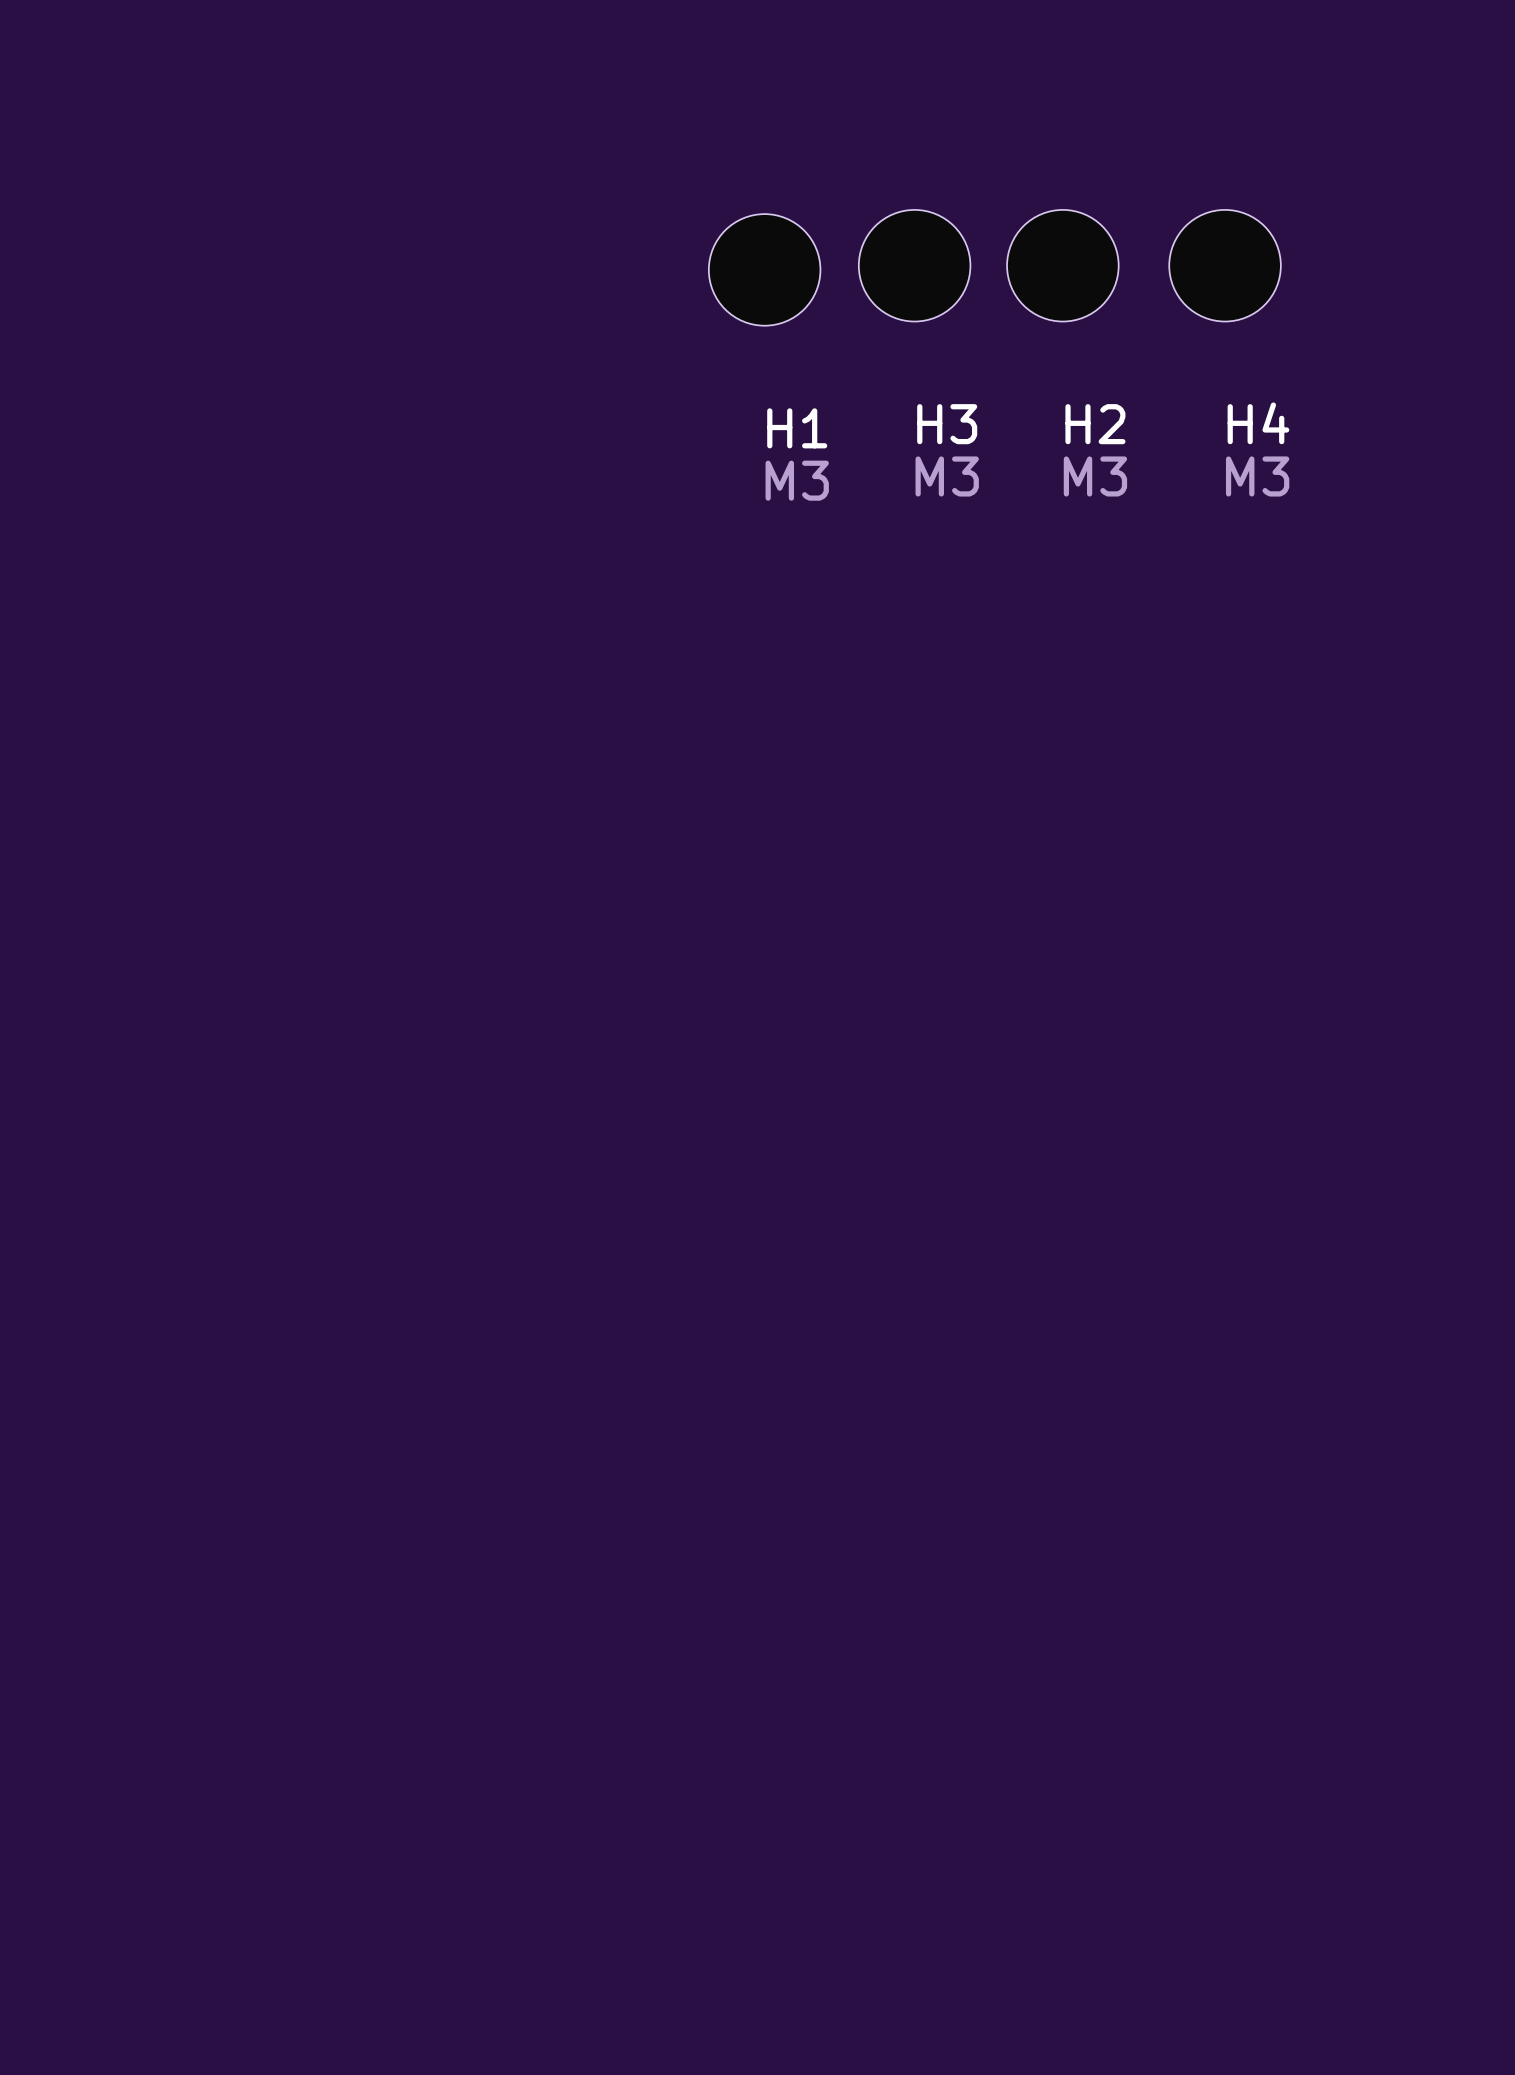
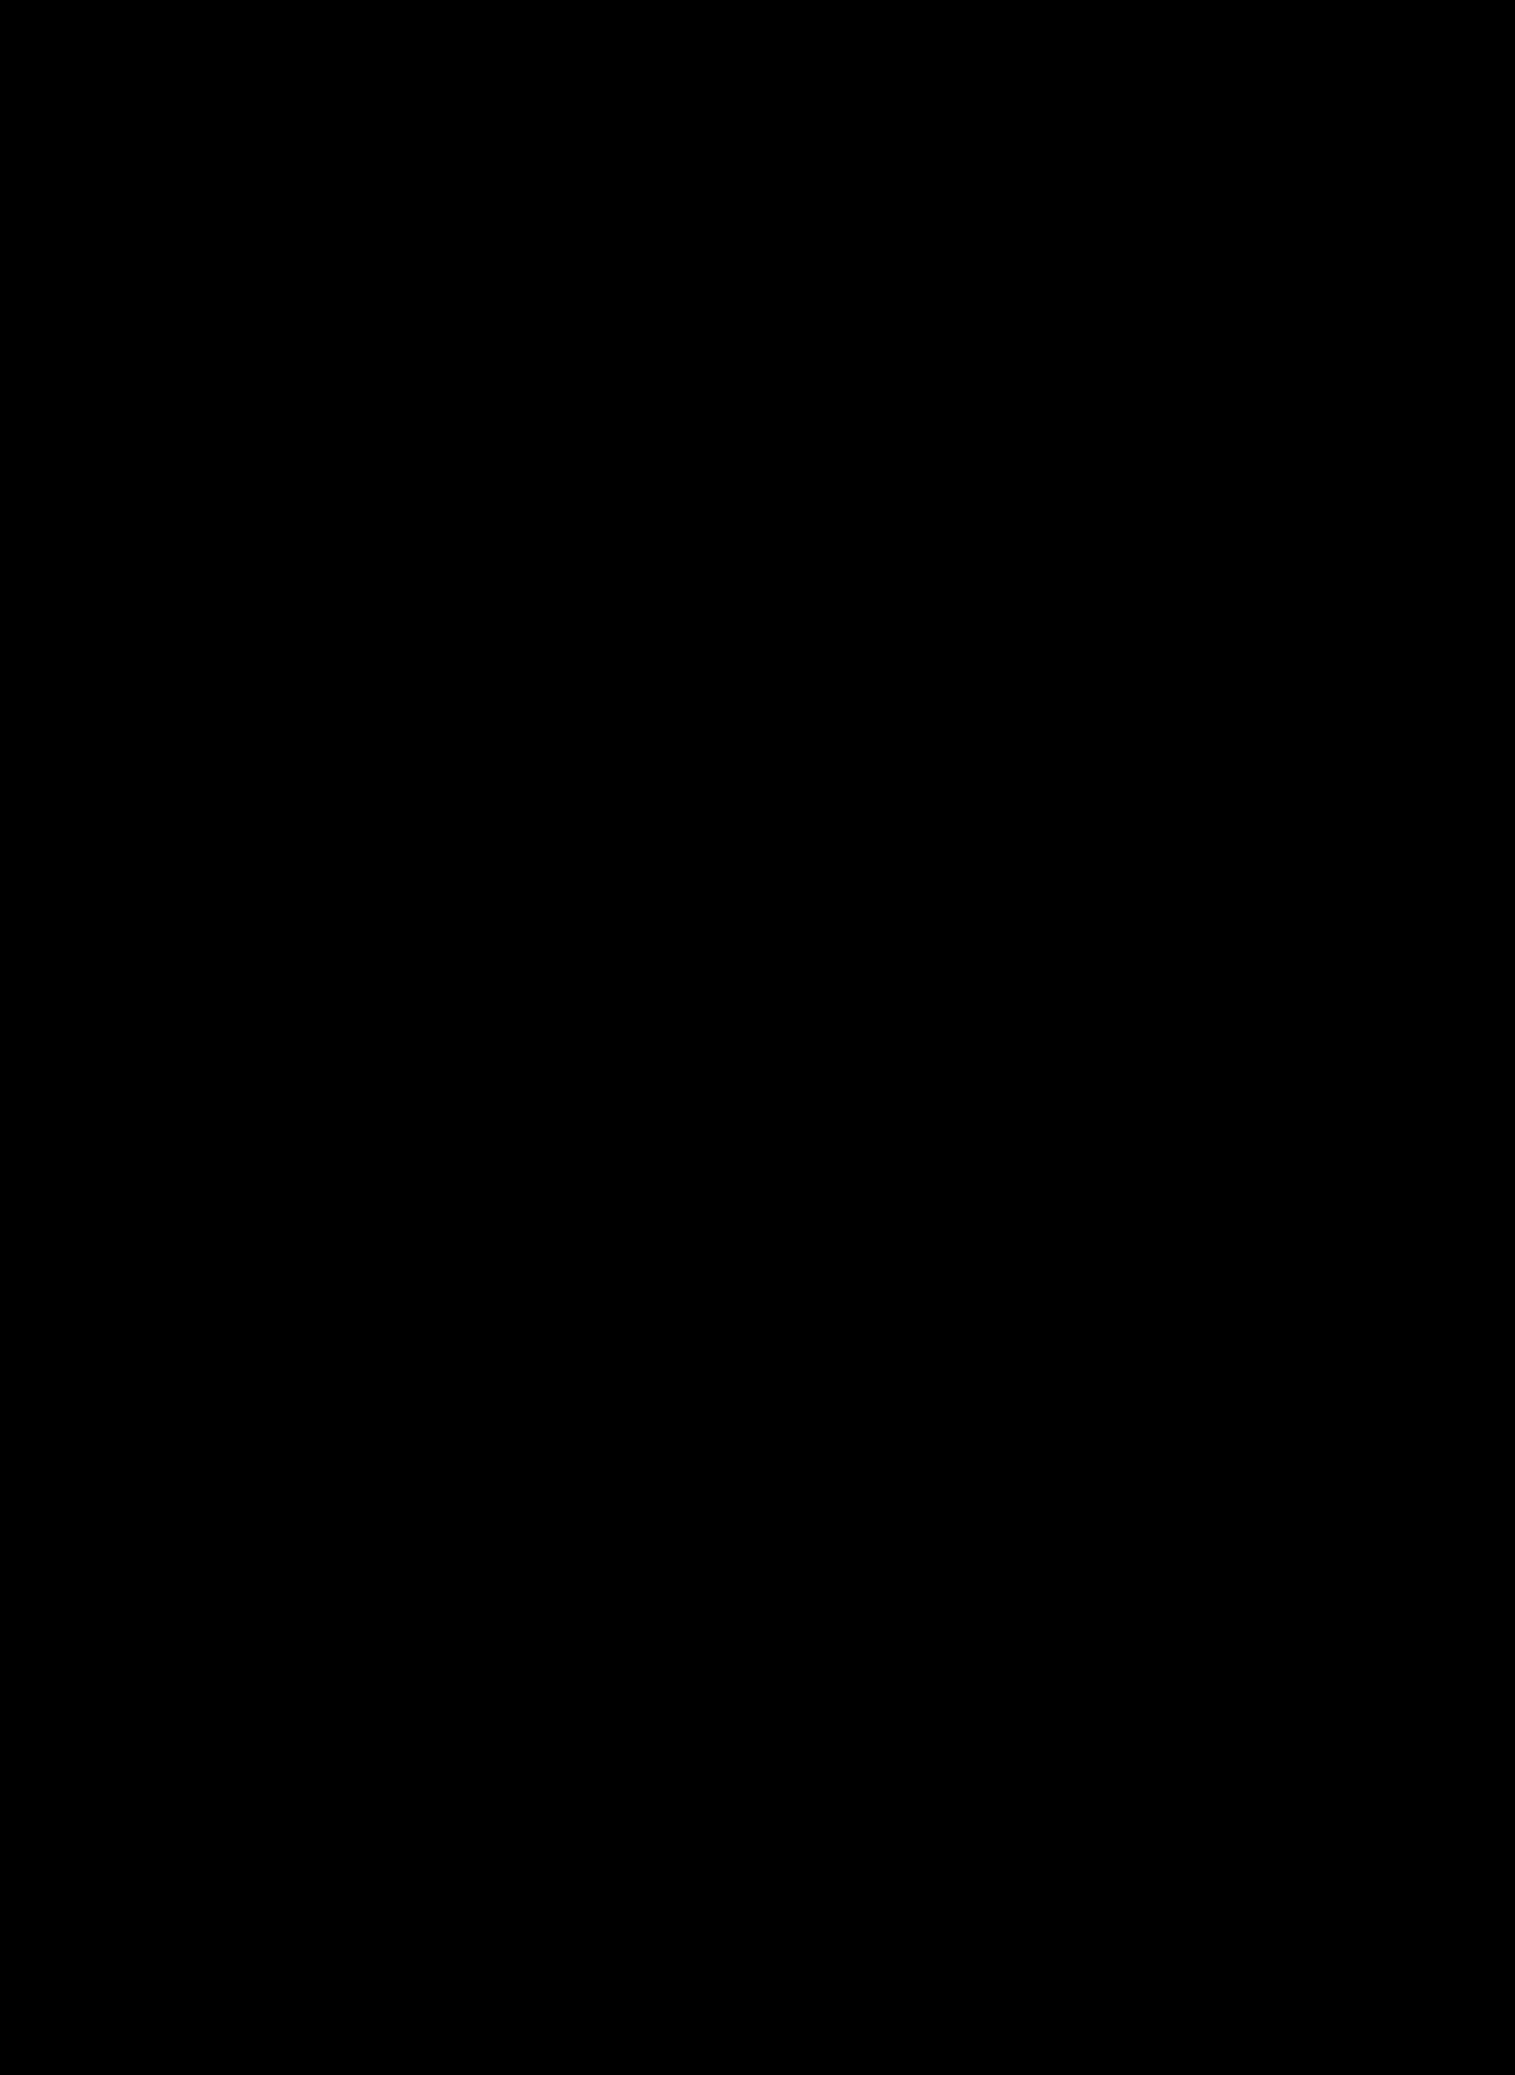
H3: M3 (914, 265) -> none
H2: M3 (1062, 265) -> none
H4: M3 (1225, 265) -> none
H1: M3 (764, 269) -> none

